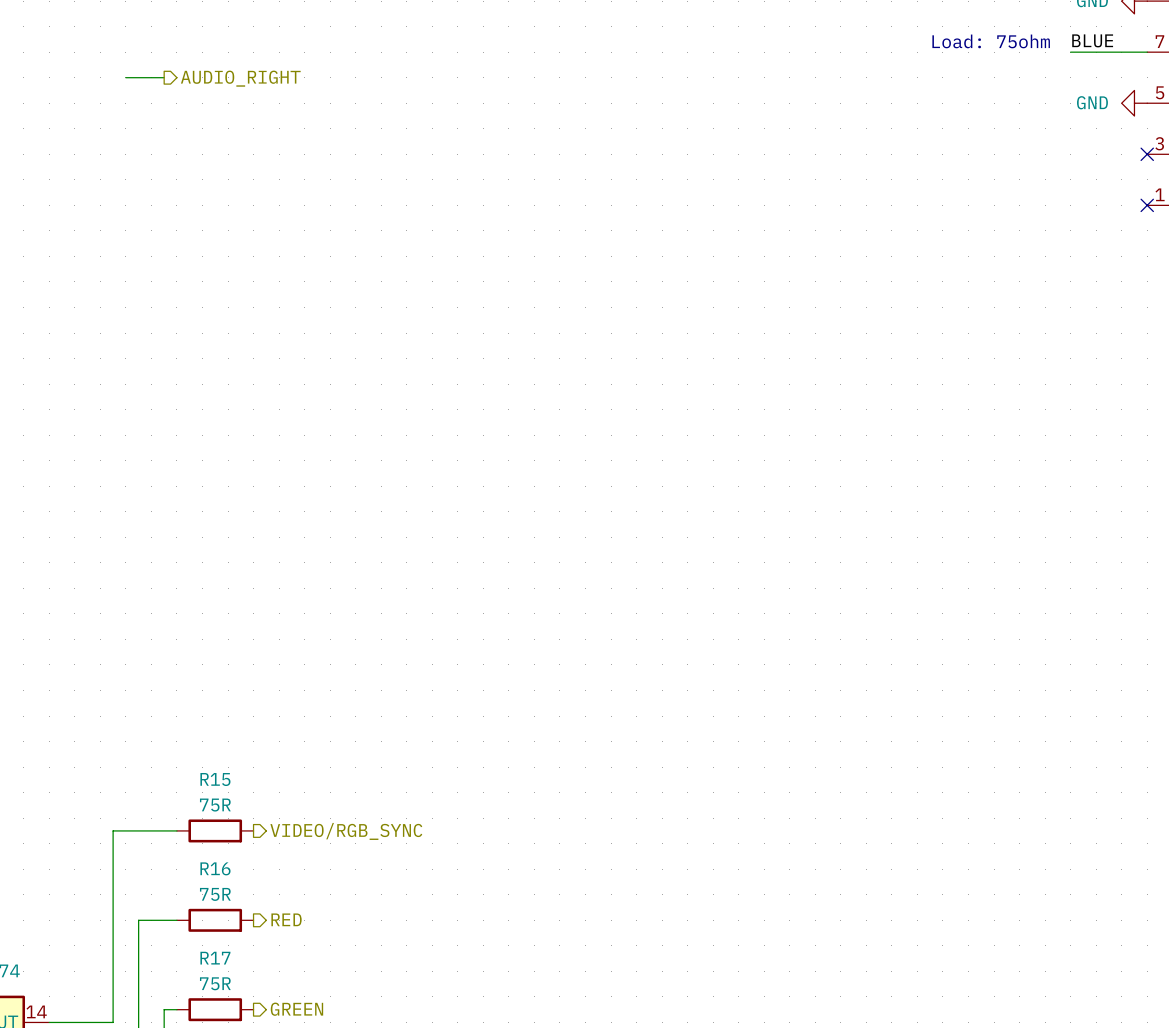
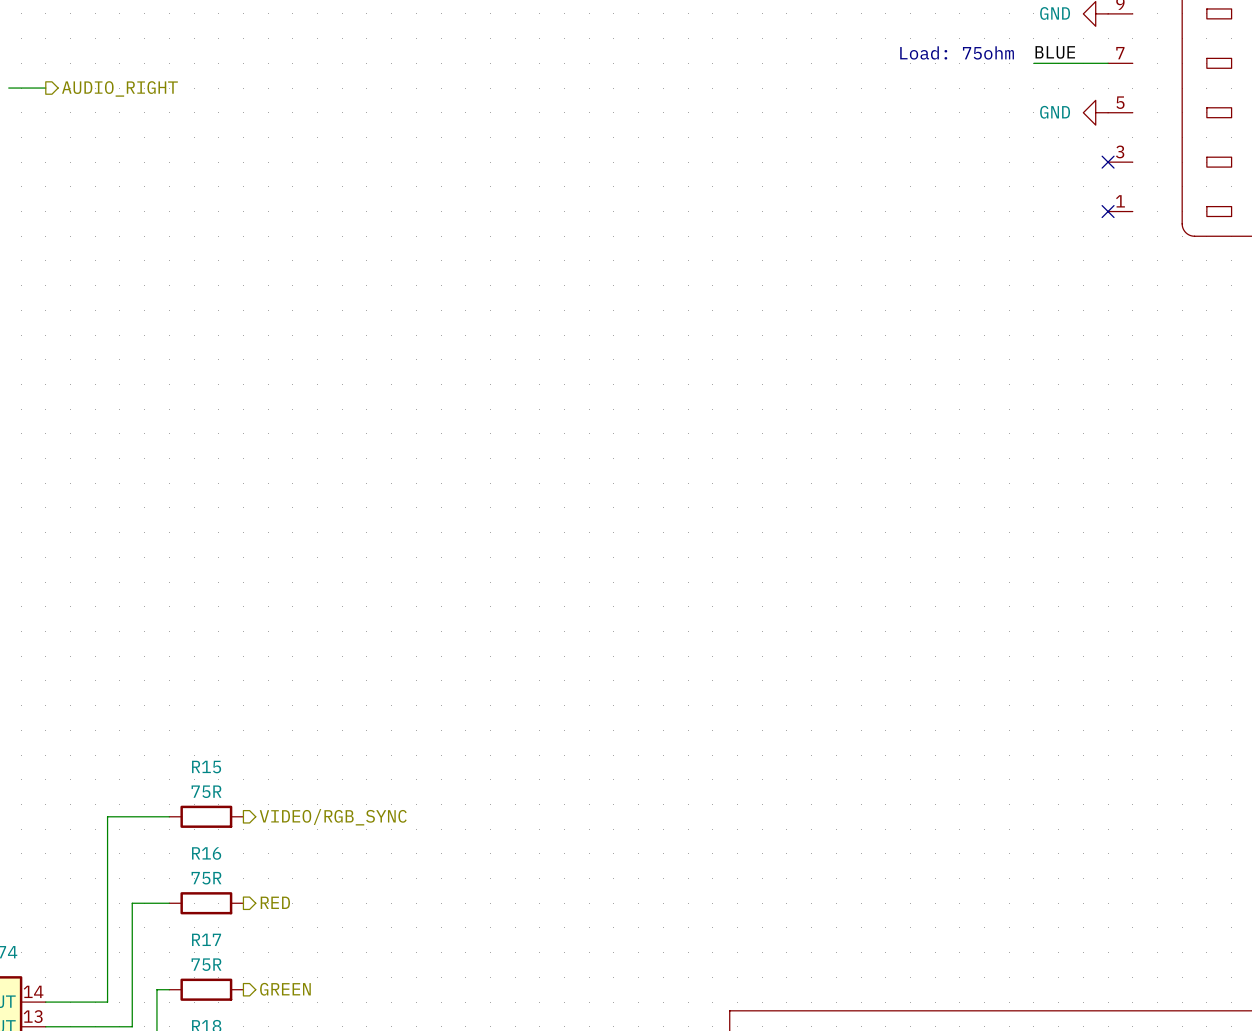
wire: (125, 77) (164, 77) -> (8, 88) (45, 88)
hierarchical label position: AUDIO_RIGHT (240, 78) -> AUDIO_RIGHT (119, 88)

